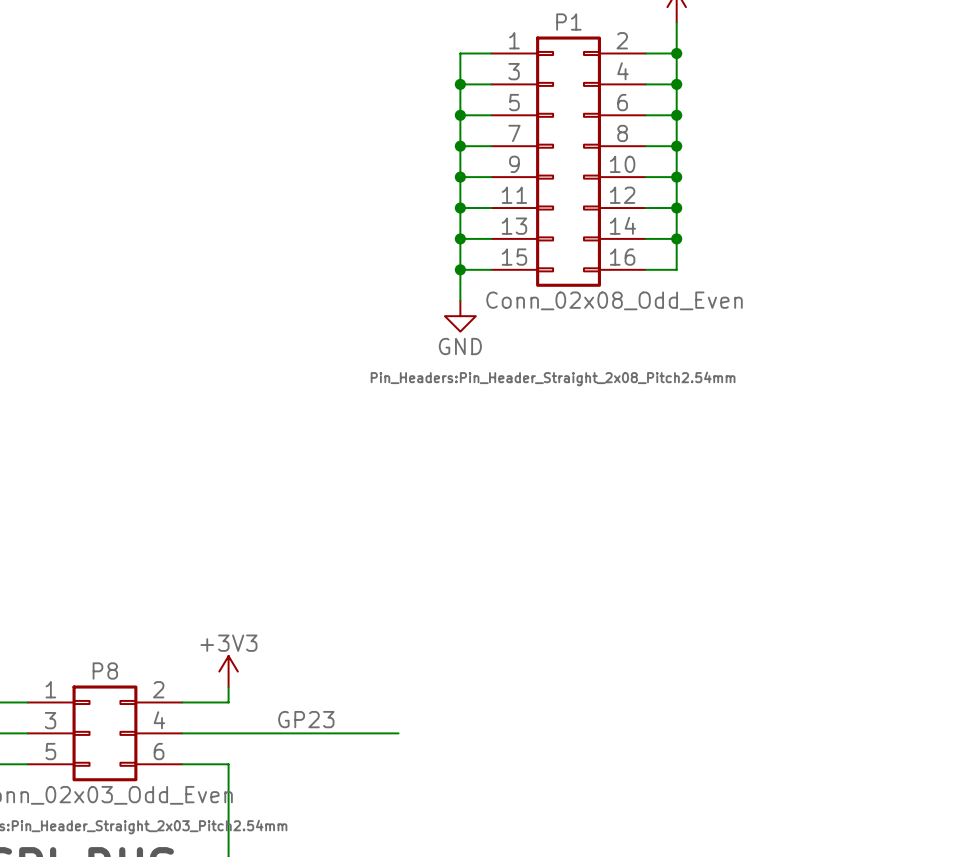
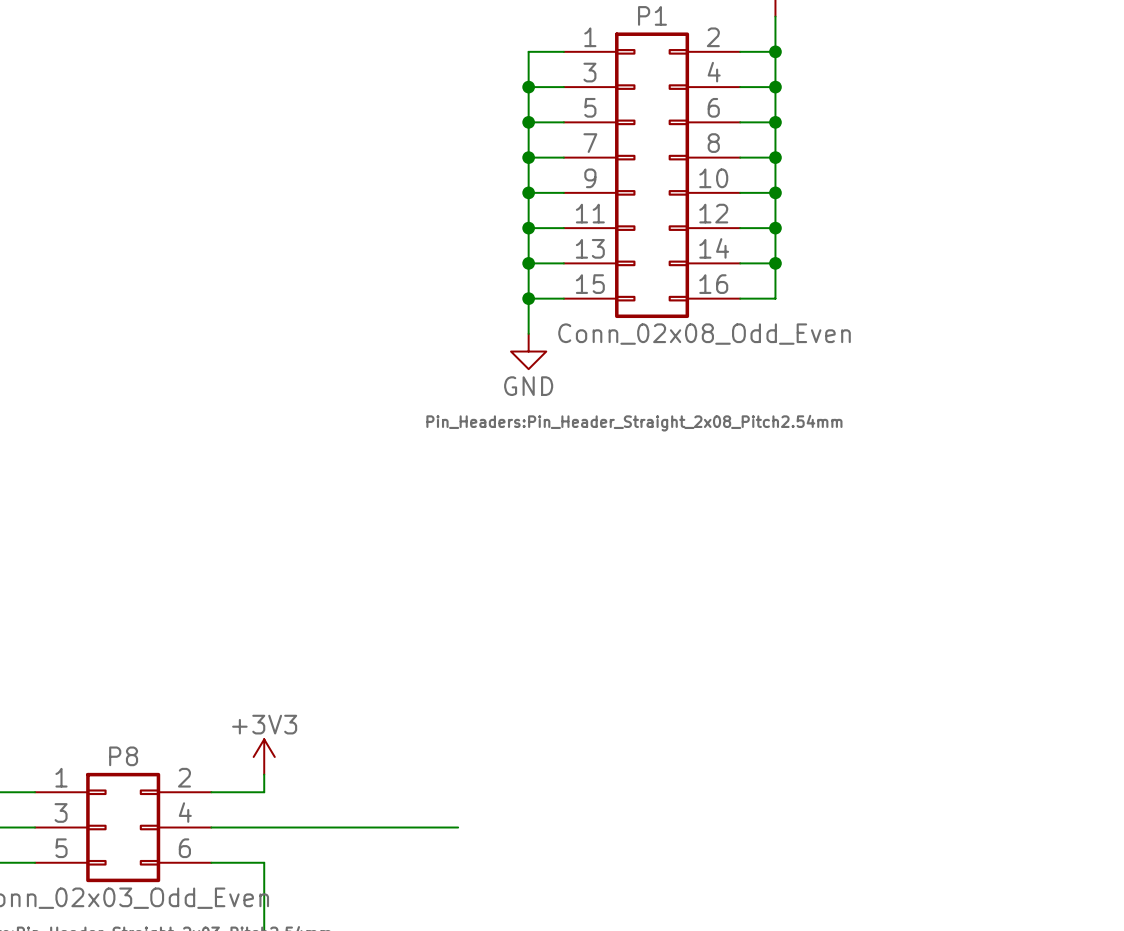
label: GP23 (306, 719) -> none

